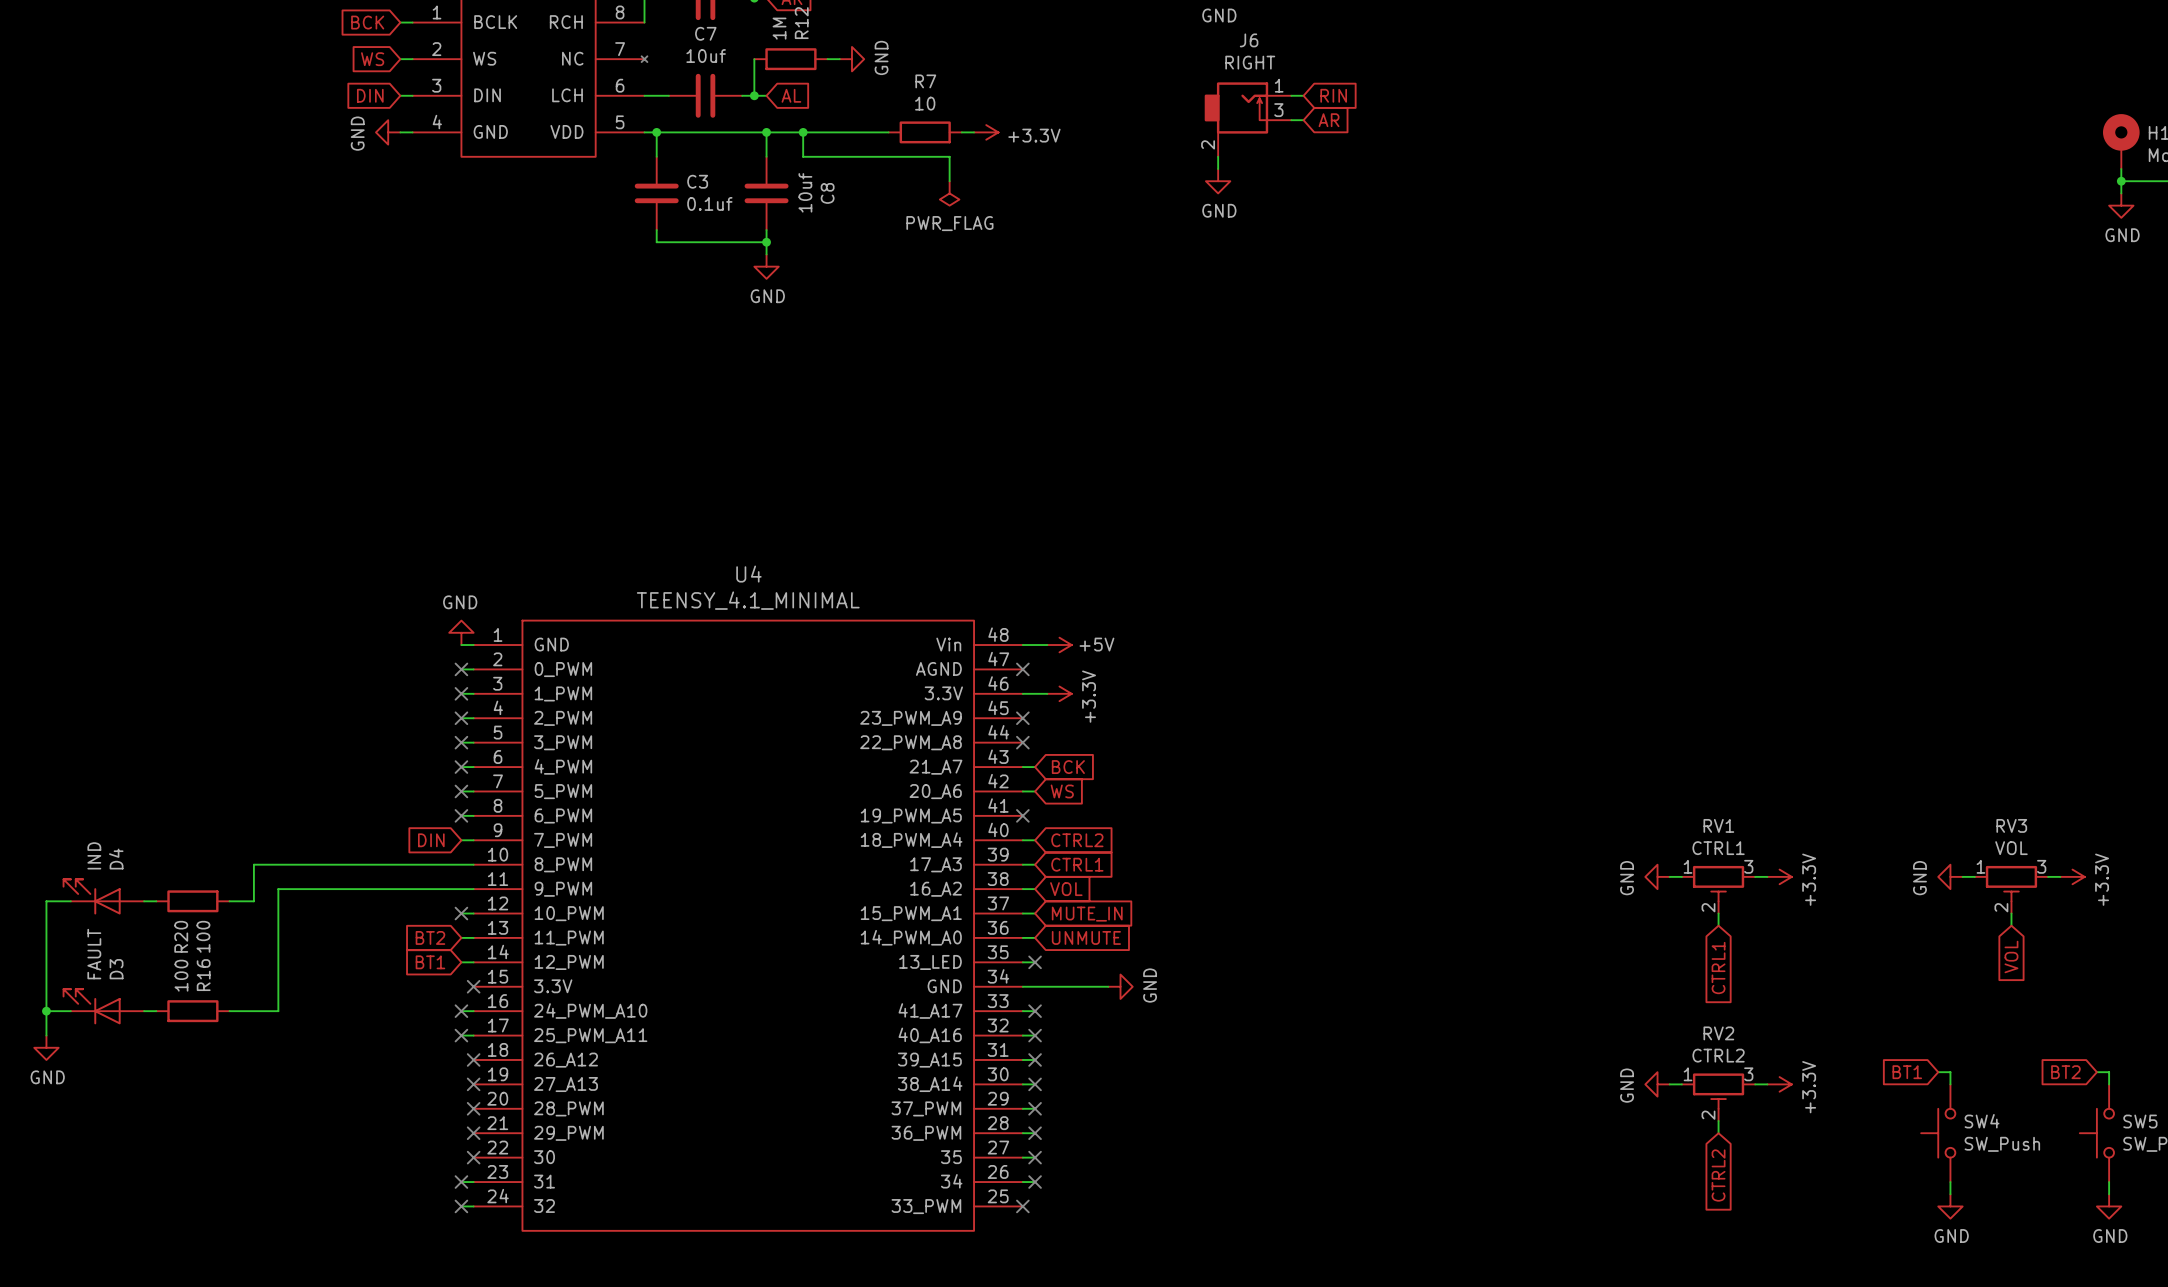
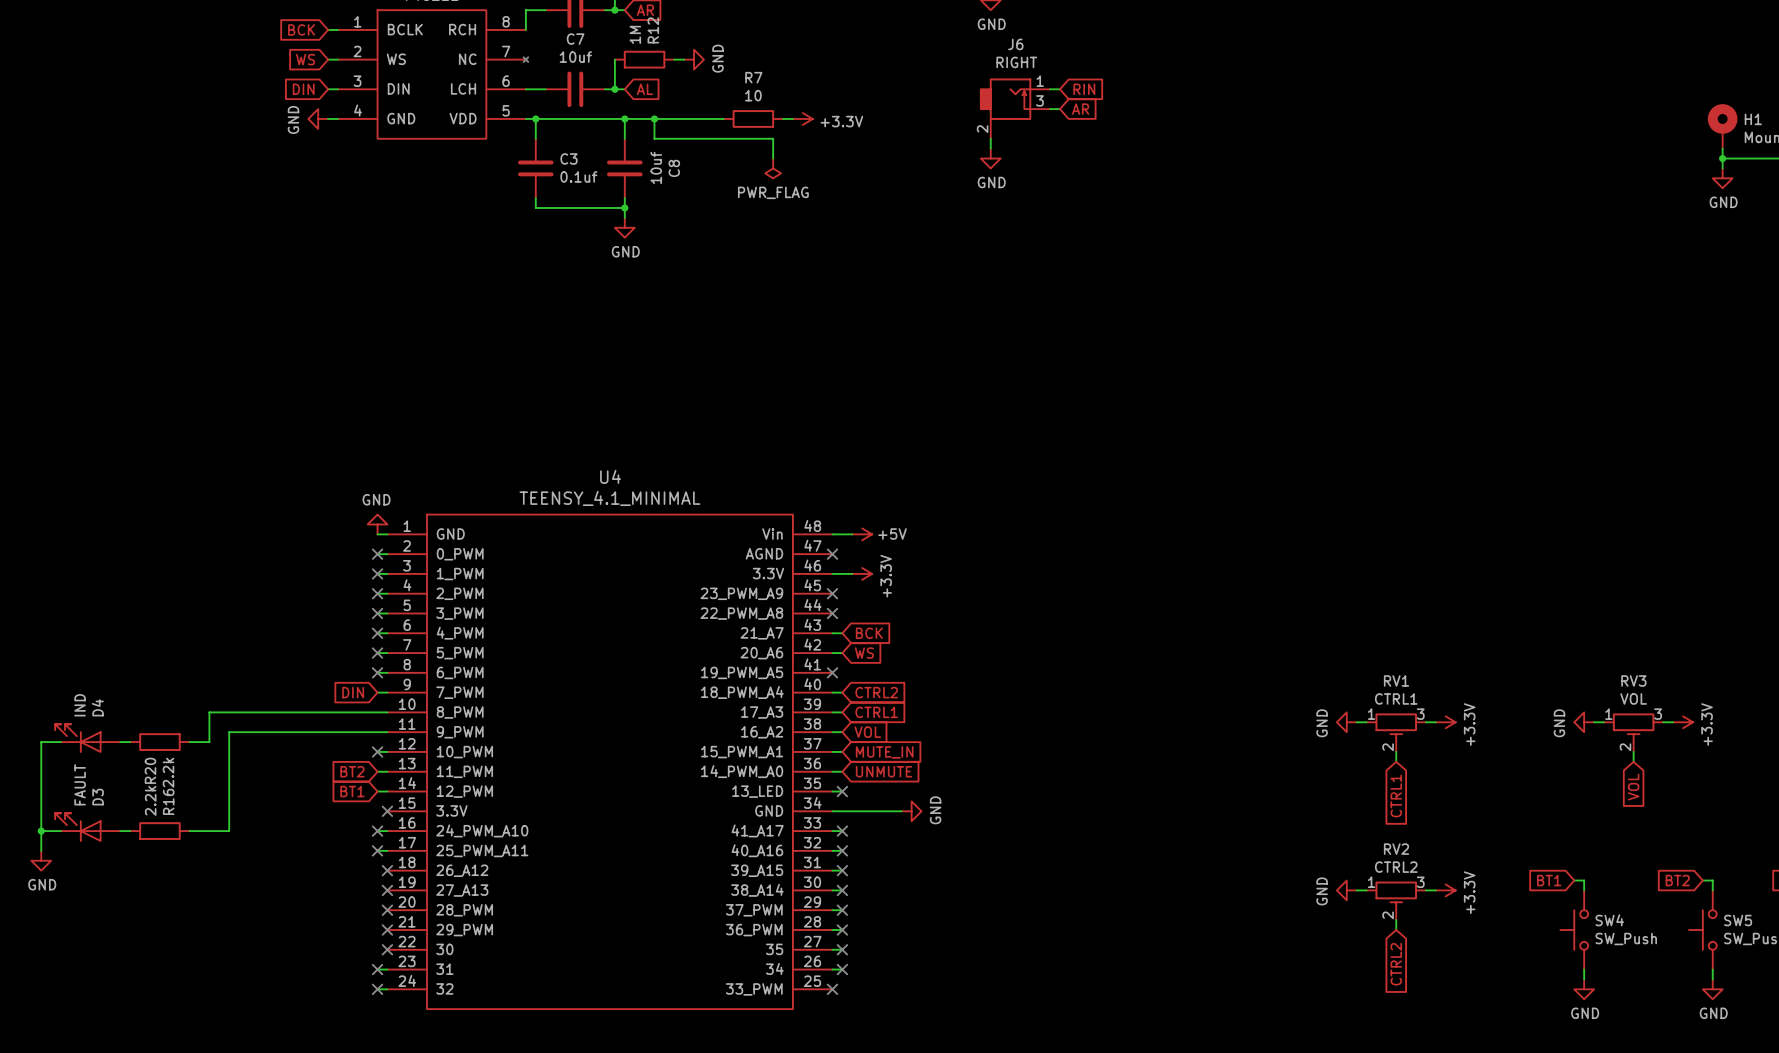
R20 value: 100 (203, 936) -> 2.2k (168, 772)
R16 value: 100 (181, 975) -> 2.2k (150, 800)

